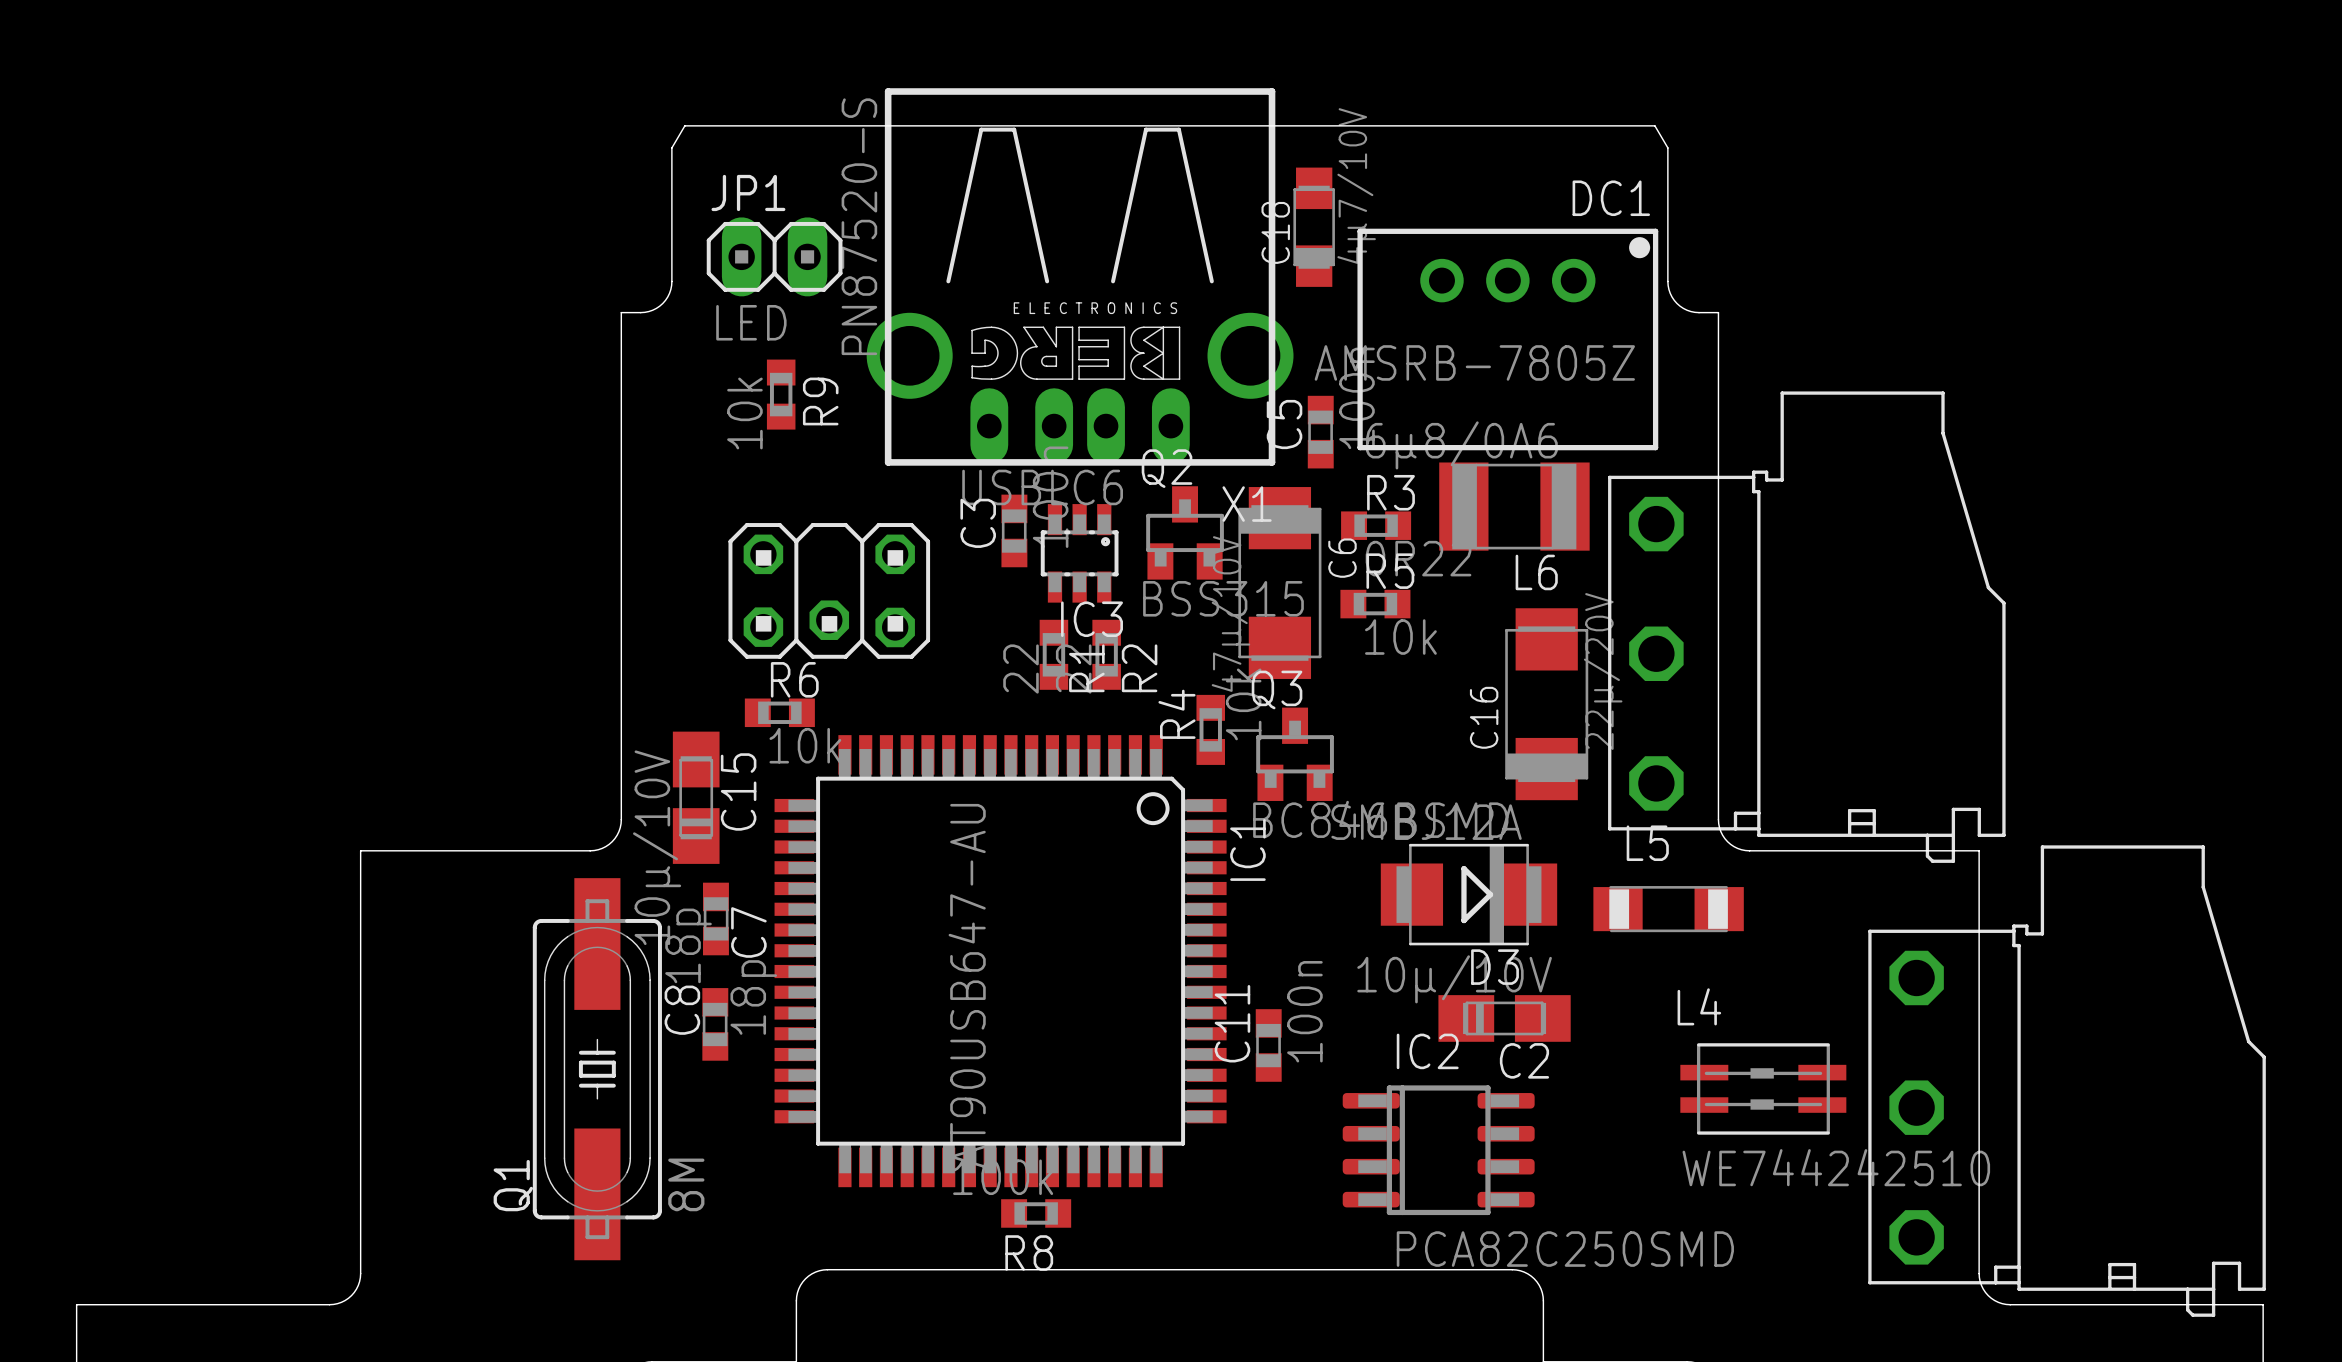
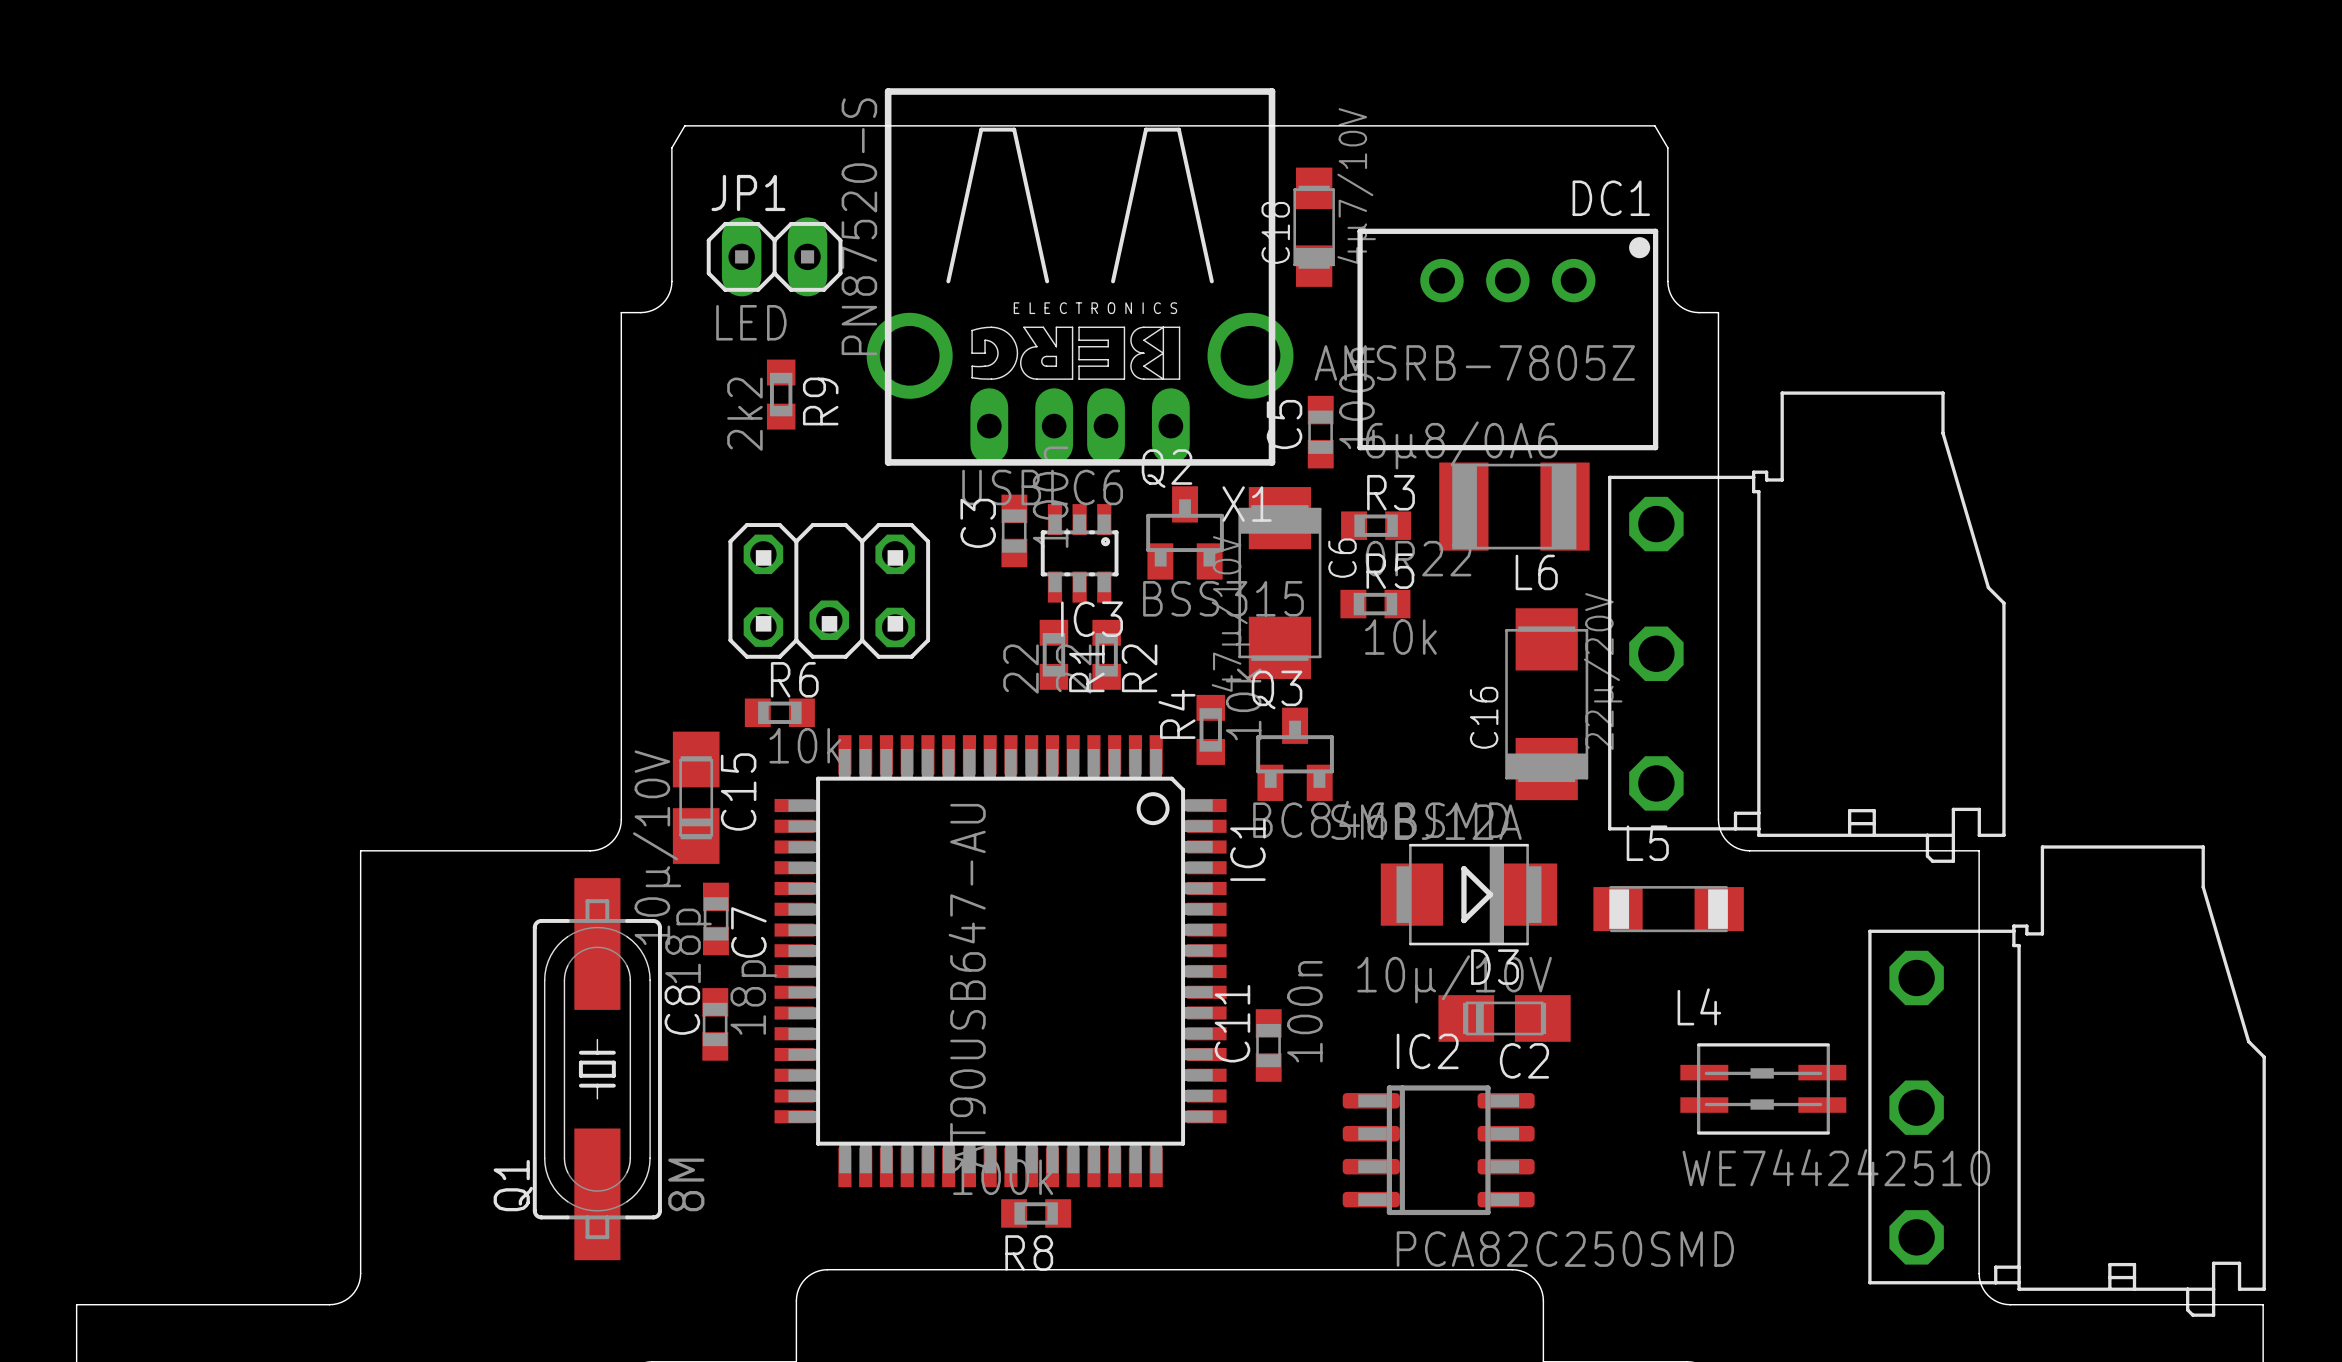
R9 value: 10k (744, 413) -> 2k2 (744, 414)

